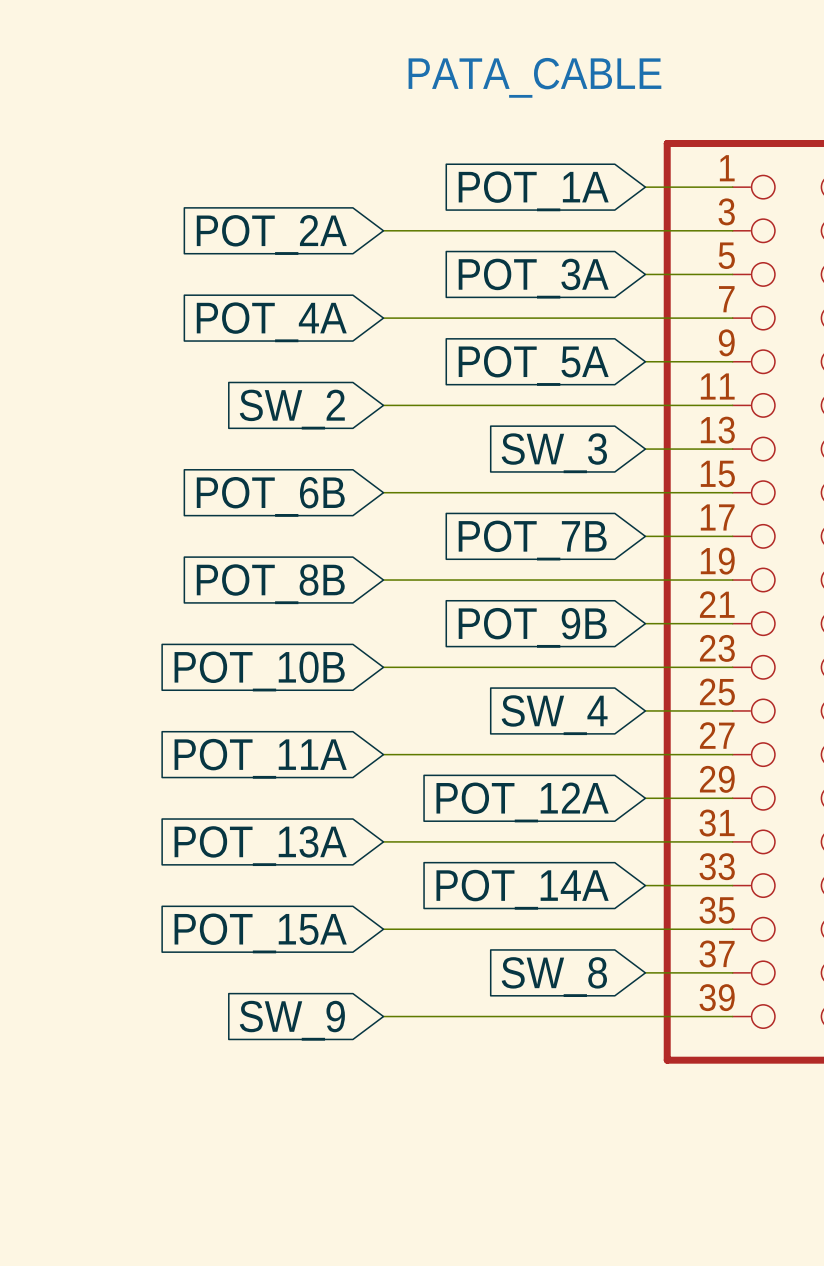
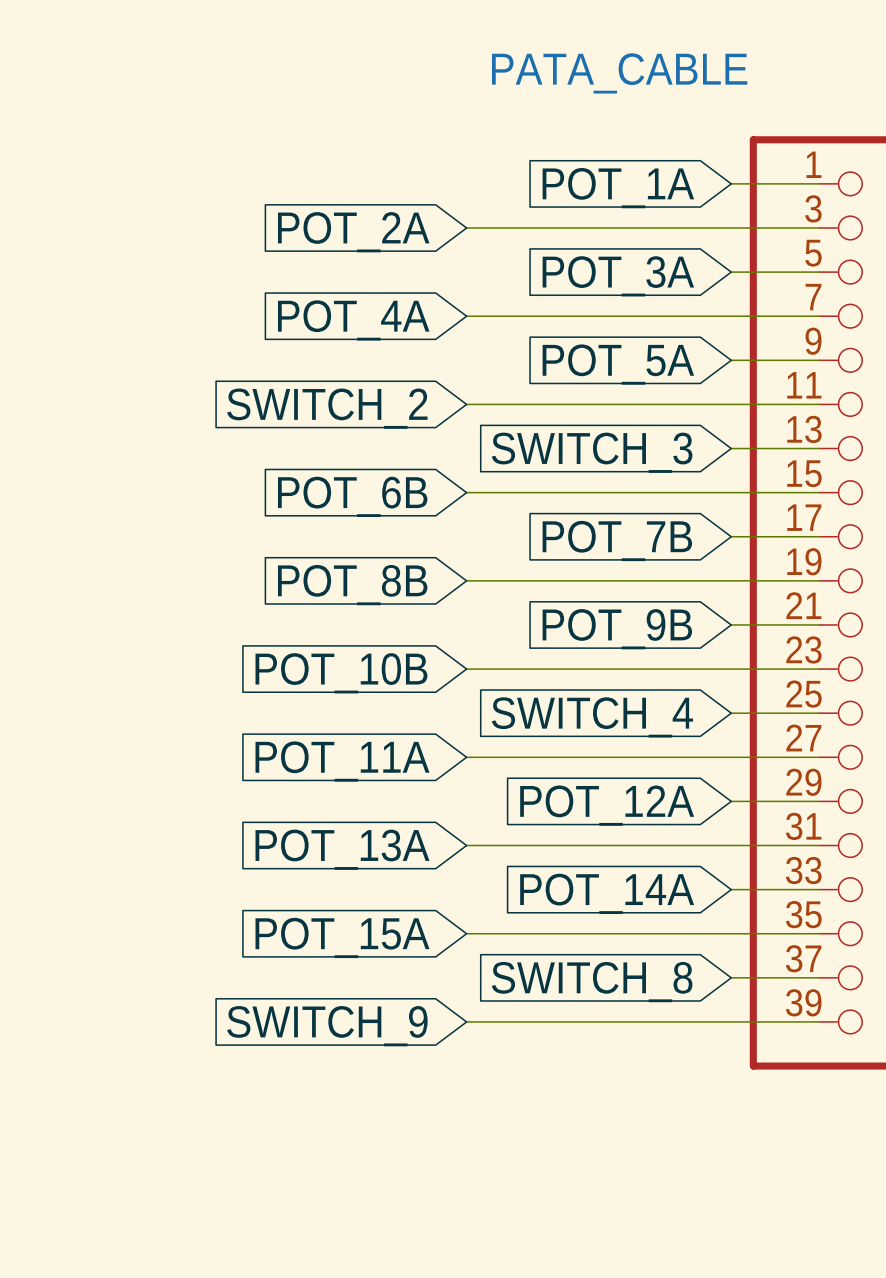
global label: SW_2 (292, 409) -> SWITCH_2 (327, 408)
global label: SW_3 (554, 453) -> SWITCH_3 (592, 452)
global label: SW_4 (554, 715) -> SWITCH_4 (592, 717)
global label: SW_8 (554, 977) -> SWITCH_8 (592, 982)
global label: SW_9 (292, 1020) -> SWITCH_9 (327, 1026)

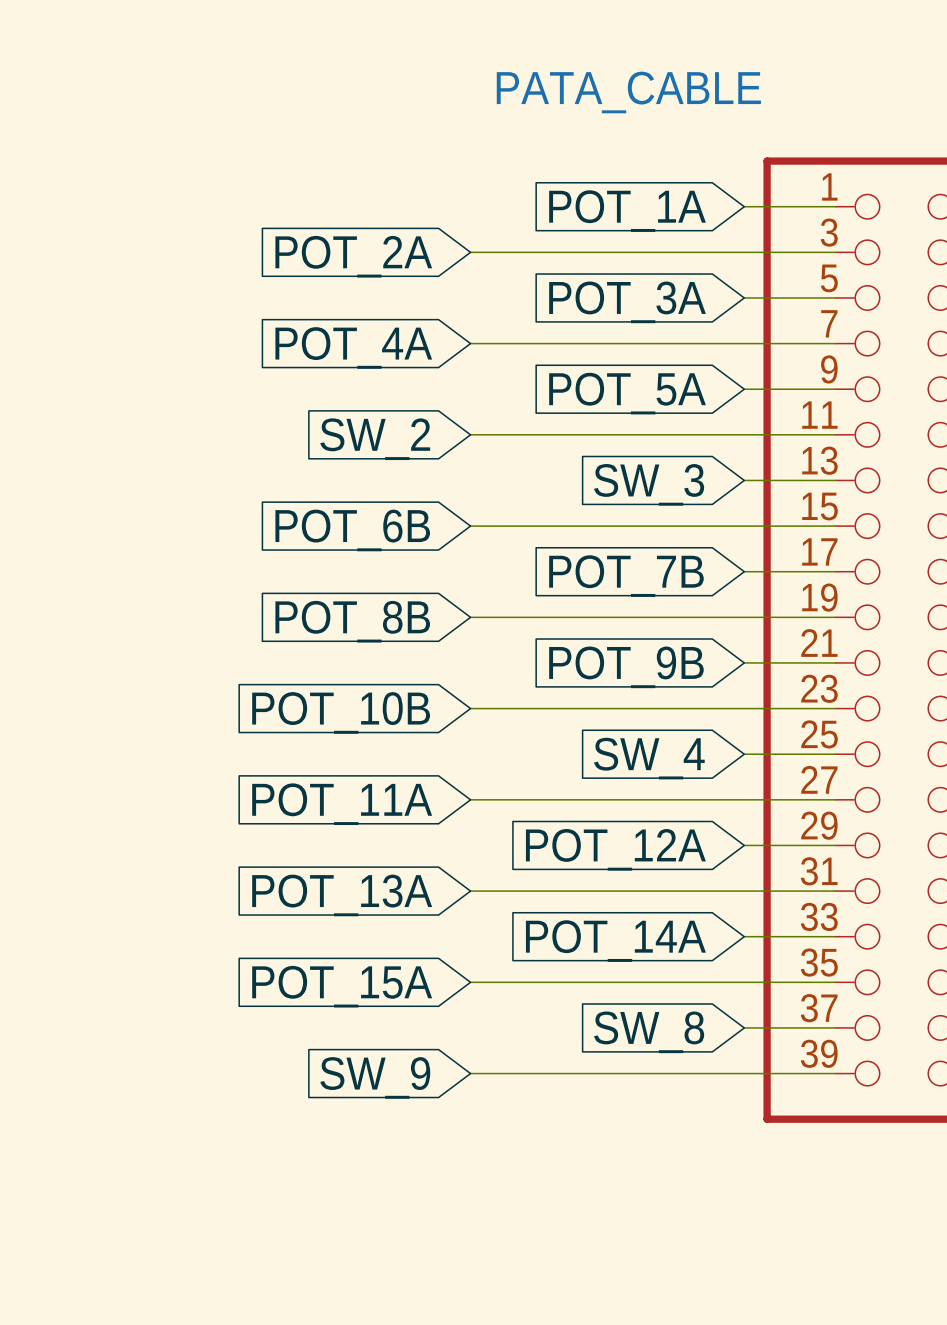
global label: SWITCH_2 (327, 408) -> SW_2 (375, 439)
global label: SWITCH_3 (592, 452) -> SW_3 (649, 484)
global label: SWITCH_4 (592, 717) -> SW_4 (649, 758)
global label: SWITCH_8 (592, 982) -> SW_8 (649, 1032)
global label: SWITCH_9 (327, 1026) -> SW_9 (375, 1077)

